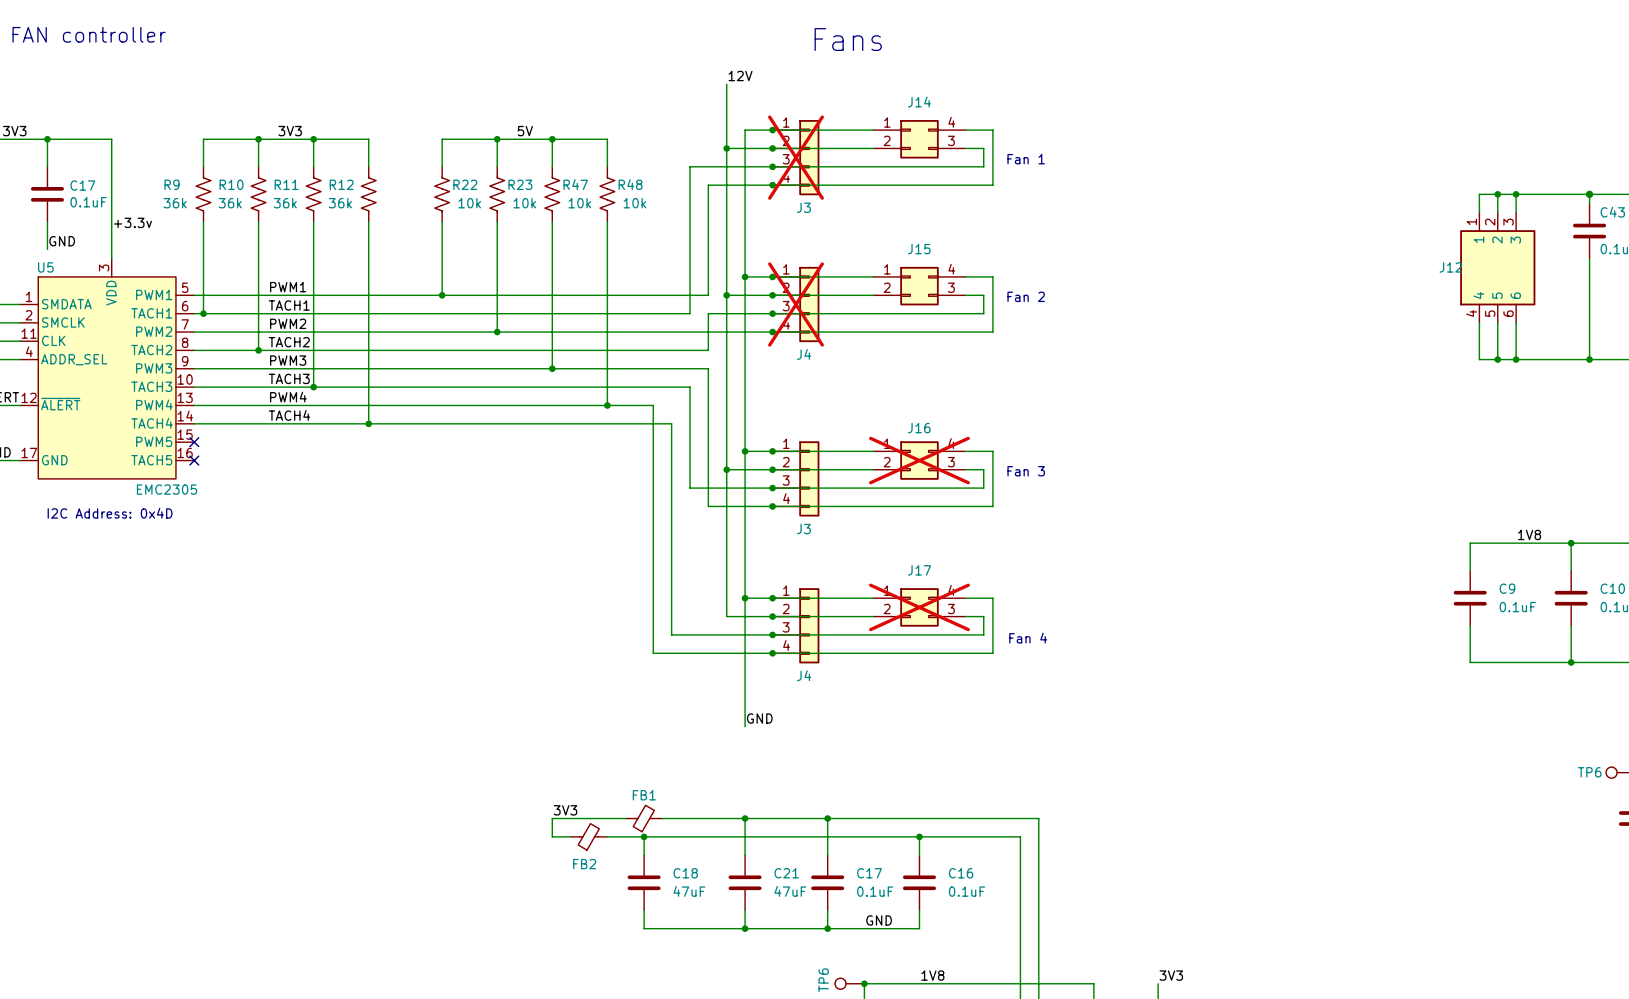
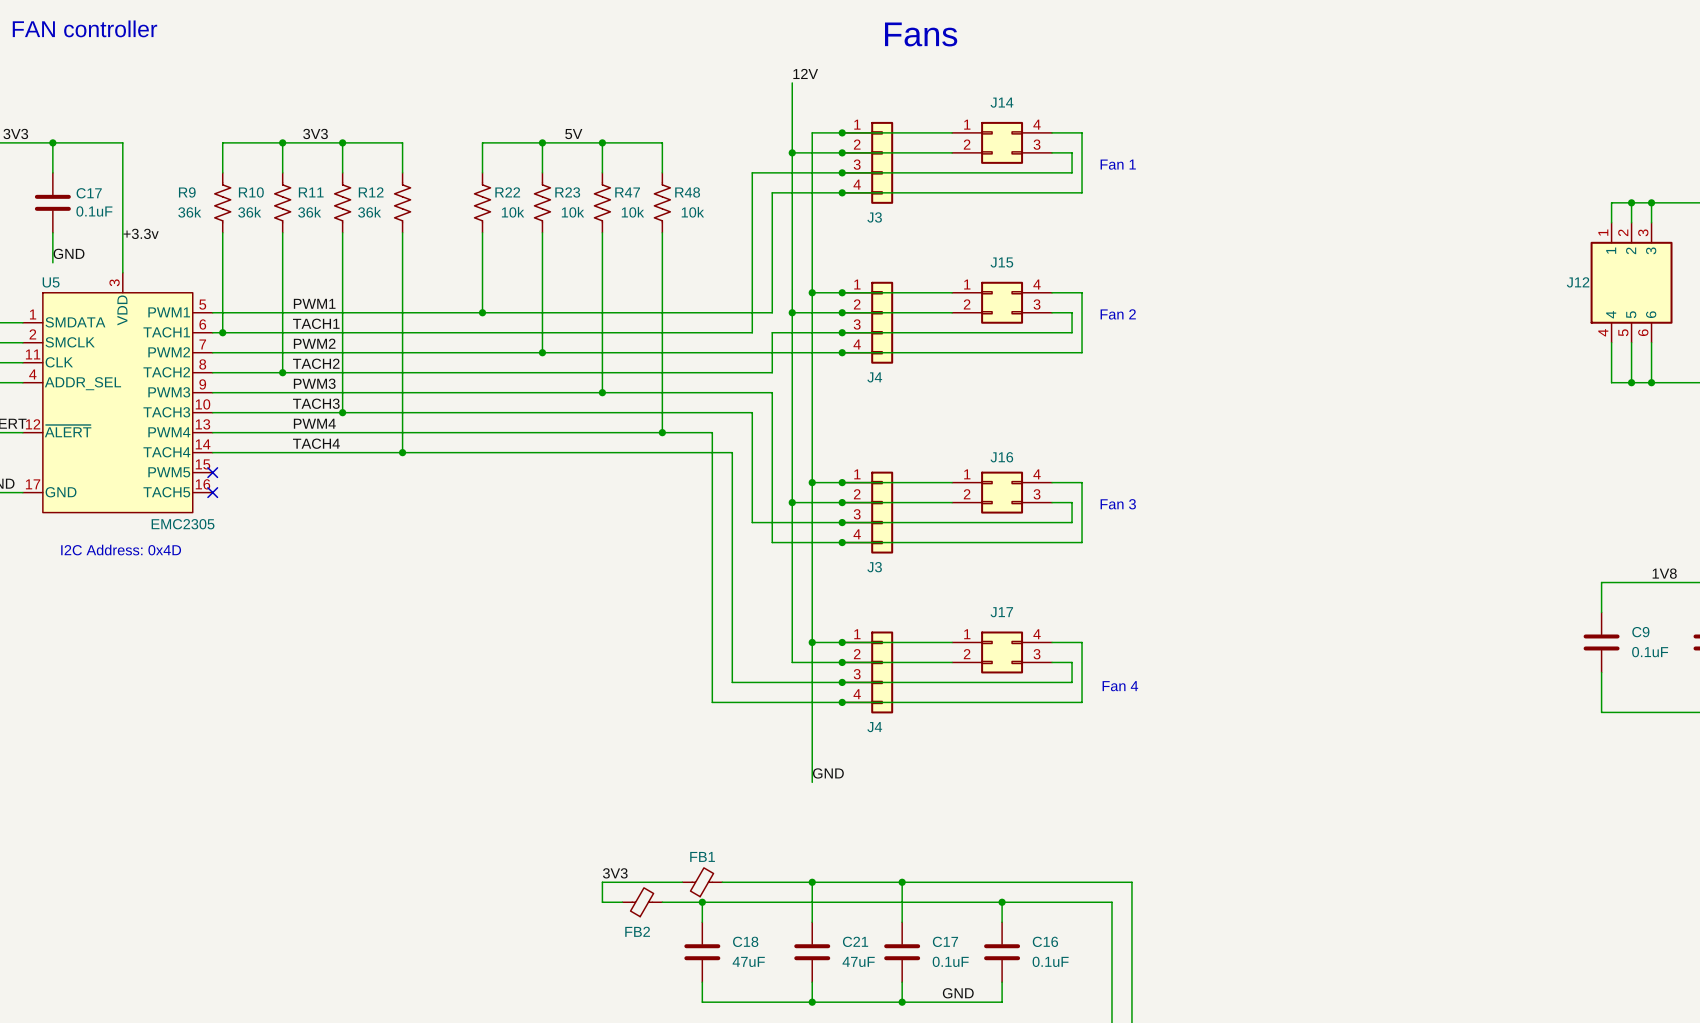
J3 do-not-place cross: (796, 157) -> none
J4 do-not-place cross: (796, 304) -> none
J16 do-not-place cross: (919, 460) -> none
J17 do-not-place cross: (919, 607) -> none

